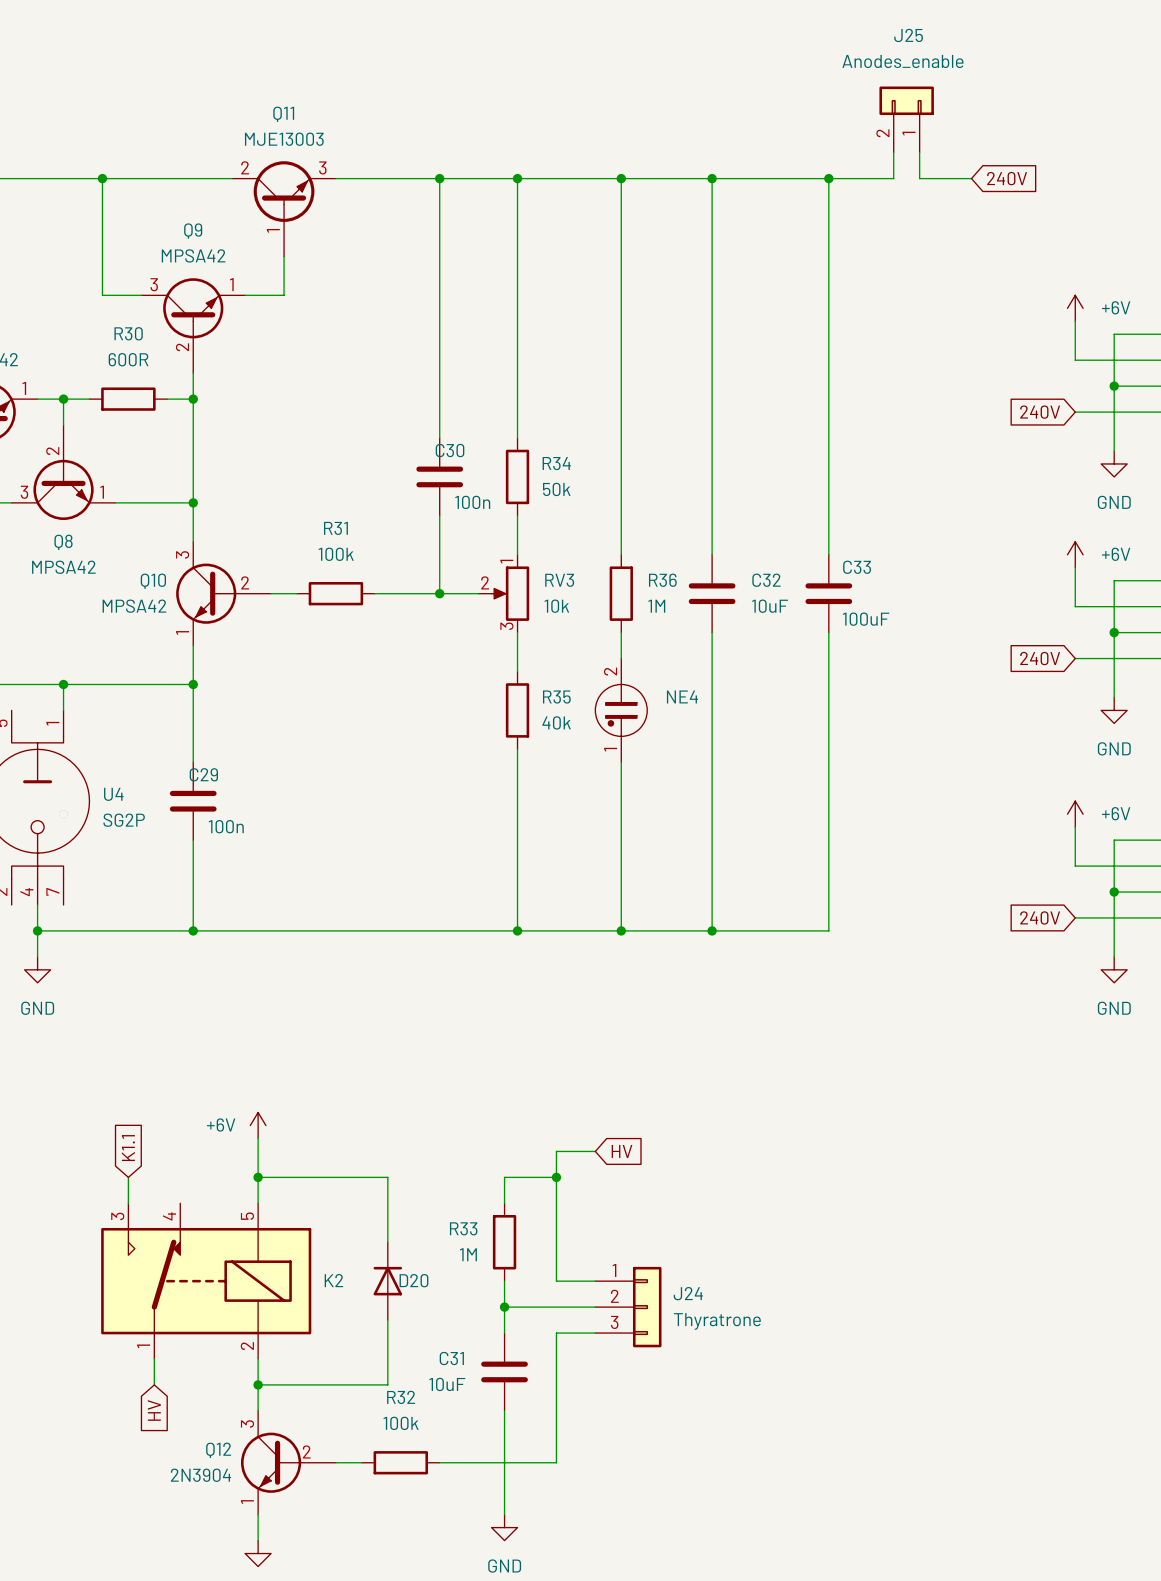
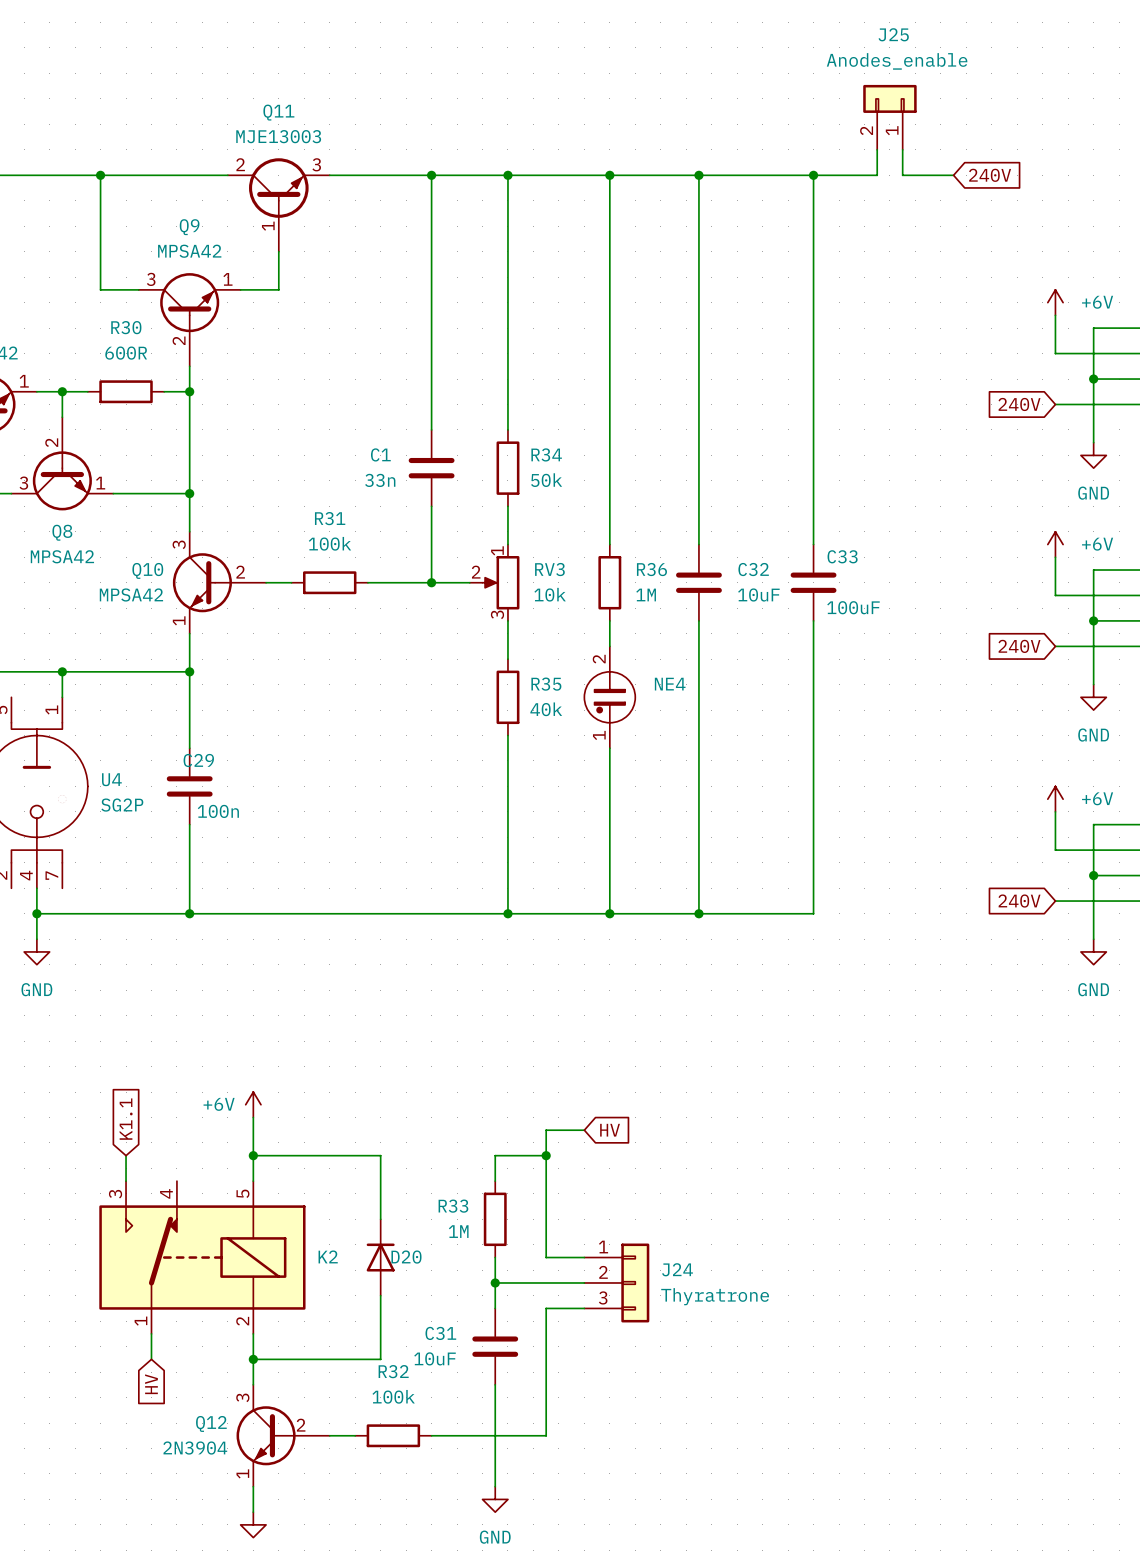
C30 name: C30 (450, 450) -> C1 (380, 454)
C30 value: 100n (472, 502) -> 33n (380, 480)

